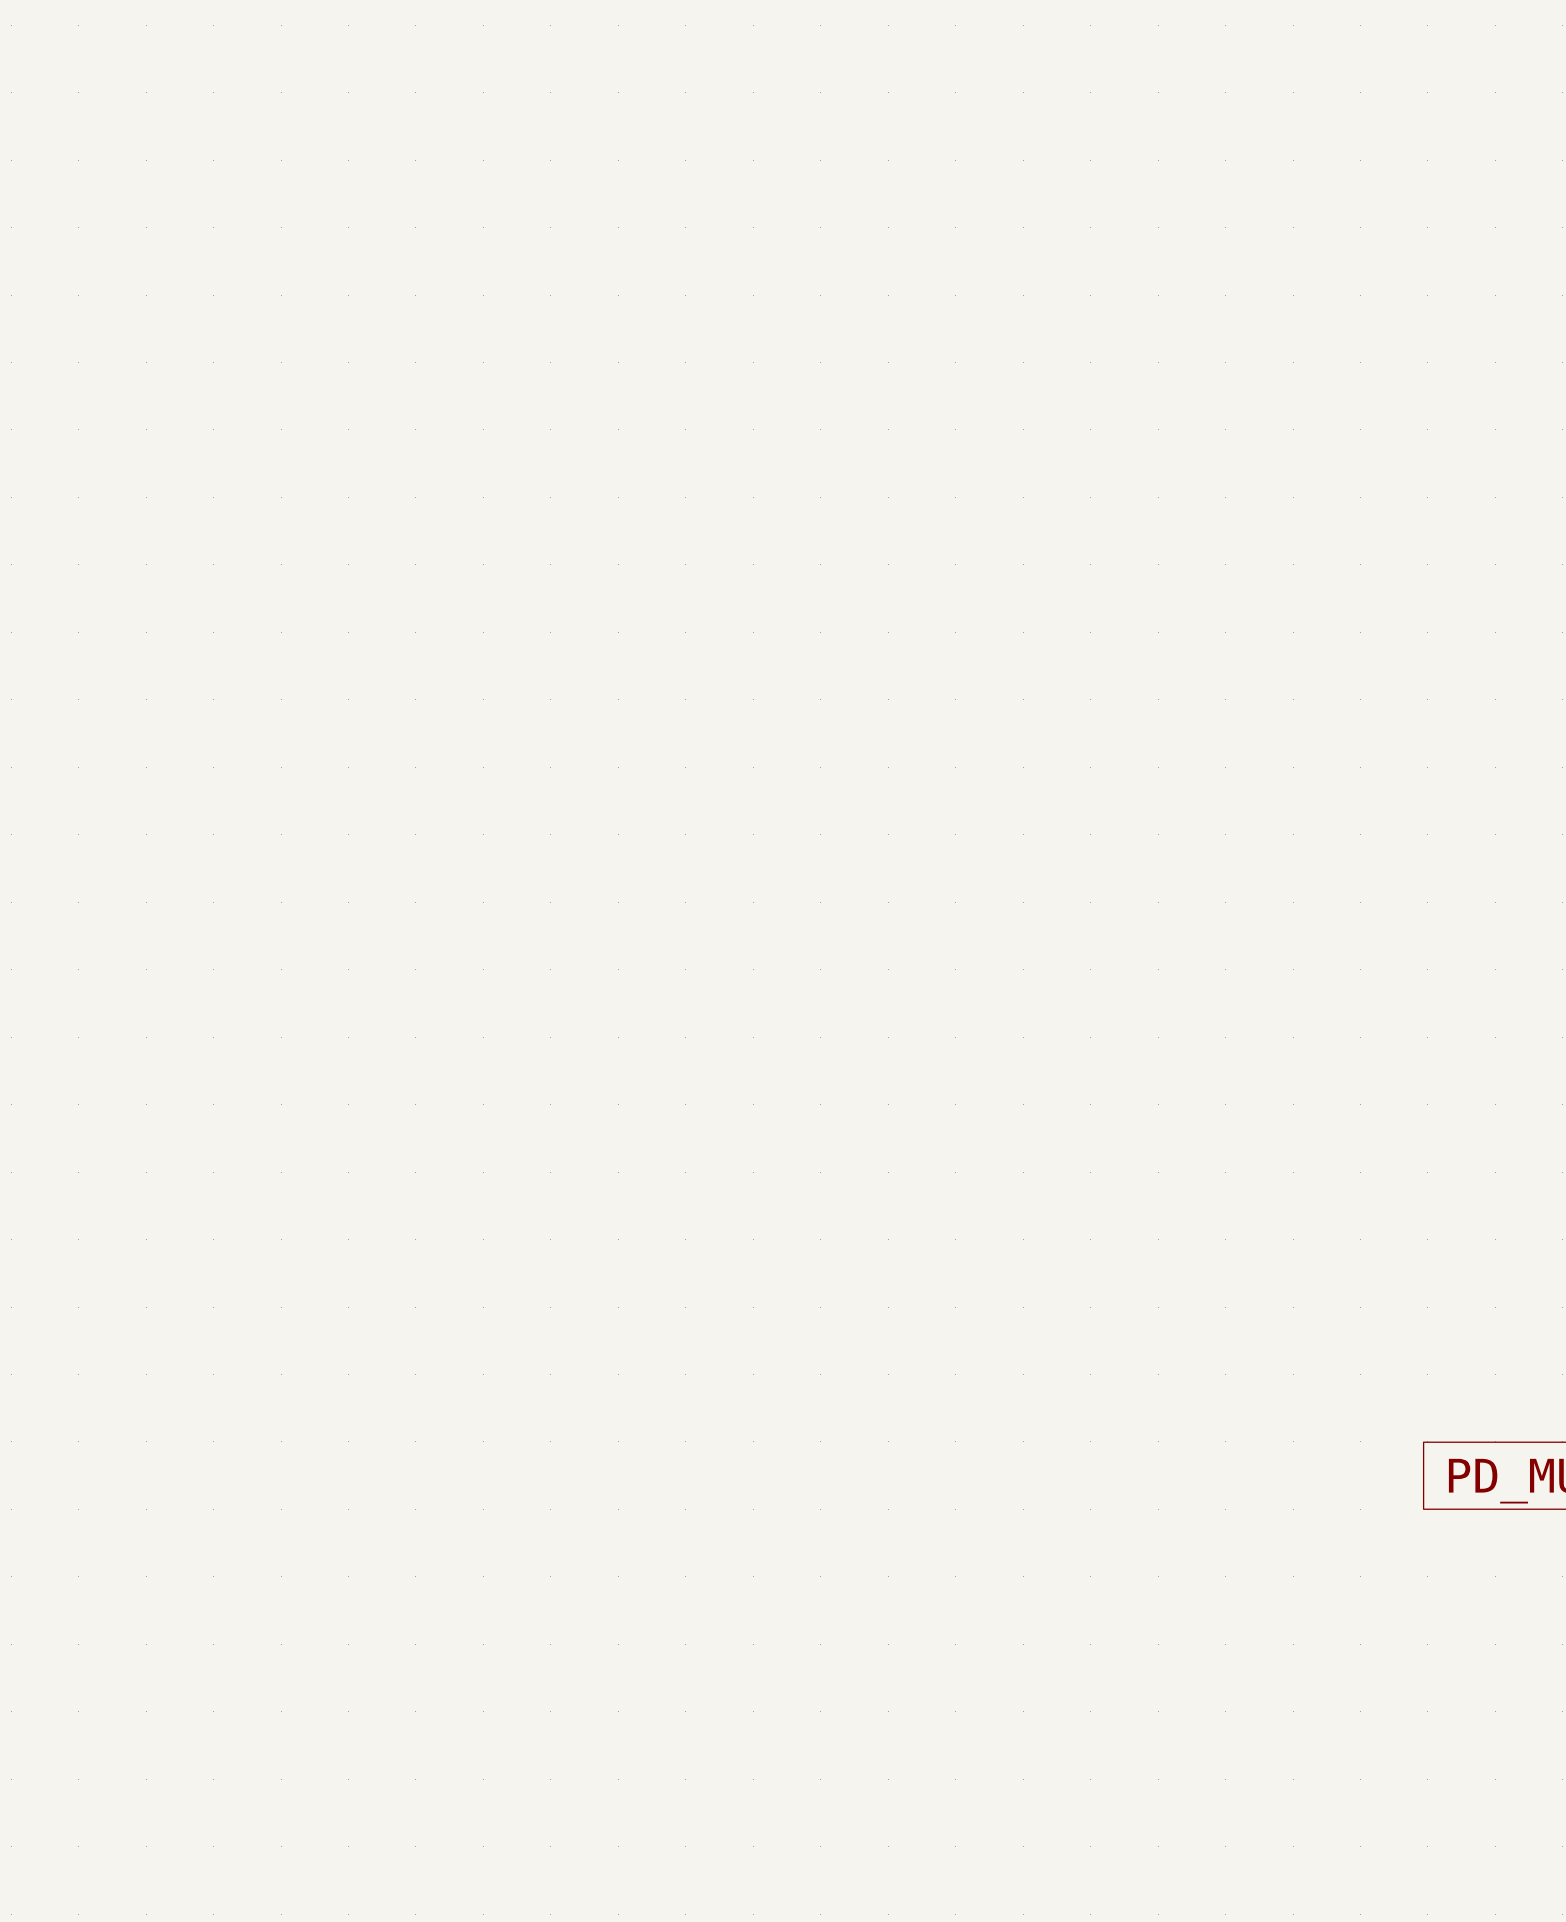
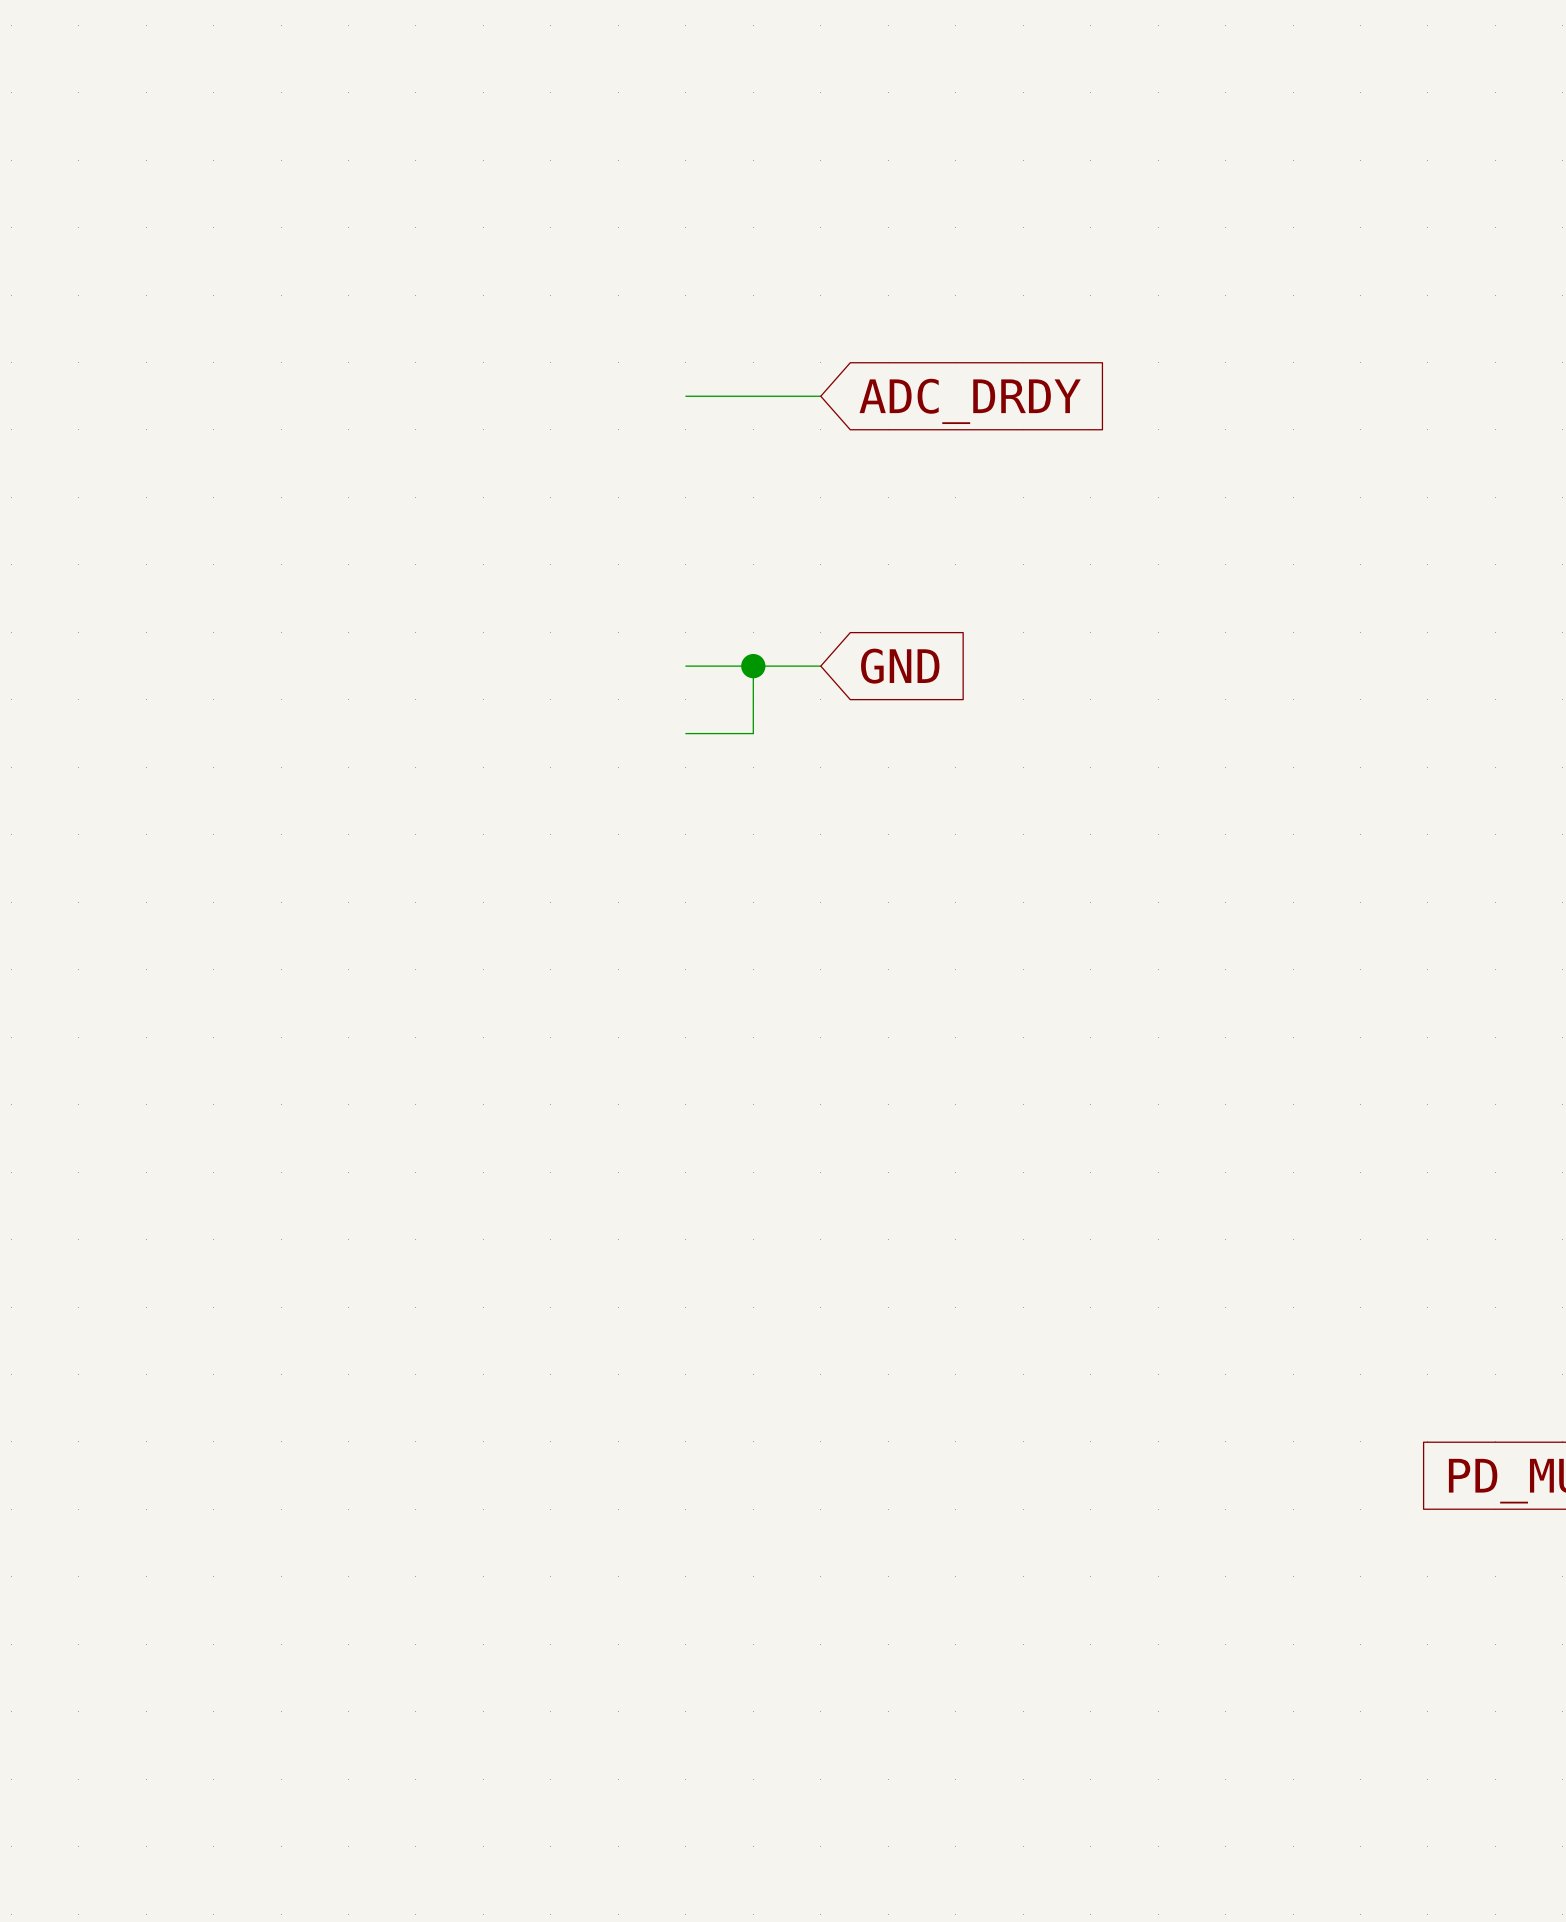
wire: none -> (685, 396) (820, 396)
global label: none -> ADC_DRDY (970, 401)
wire: none -> (685, 666) (820, 666)
wire: none -> (753, 666) (753, 733) (685, 733)
junction: none -> (753, 666)
global label: none -> GND (900, 666)

